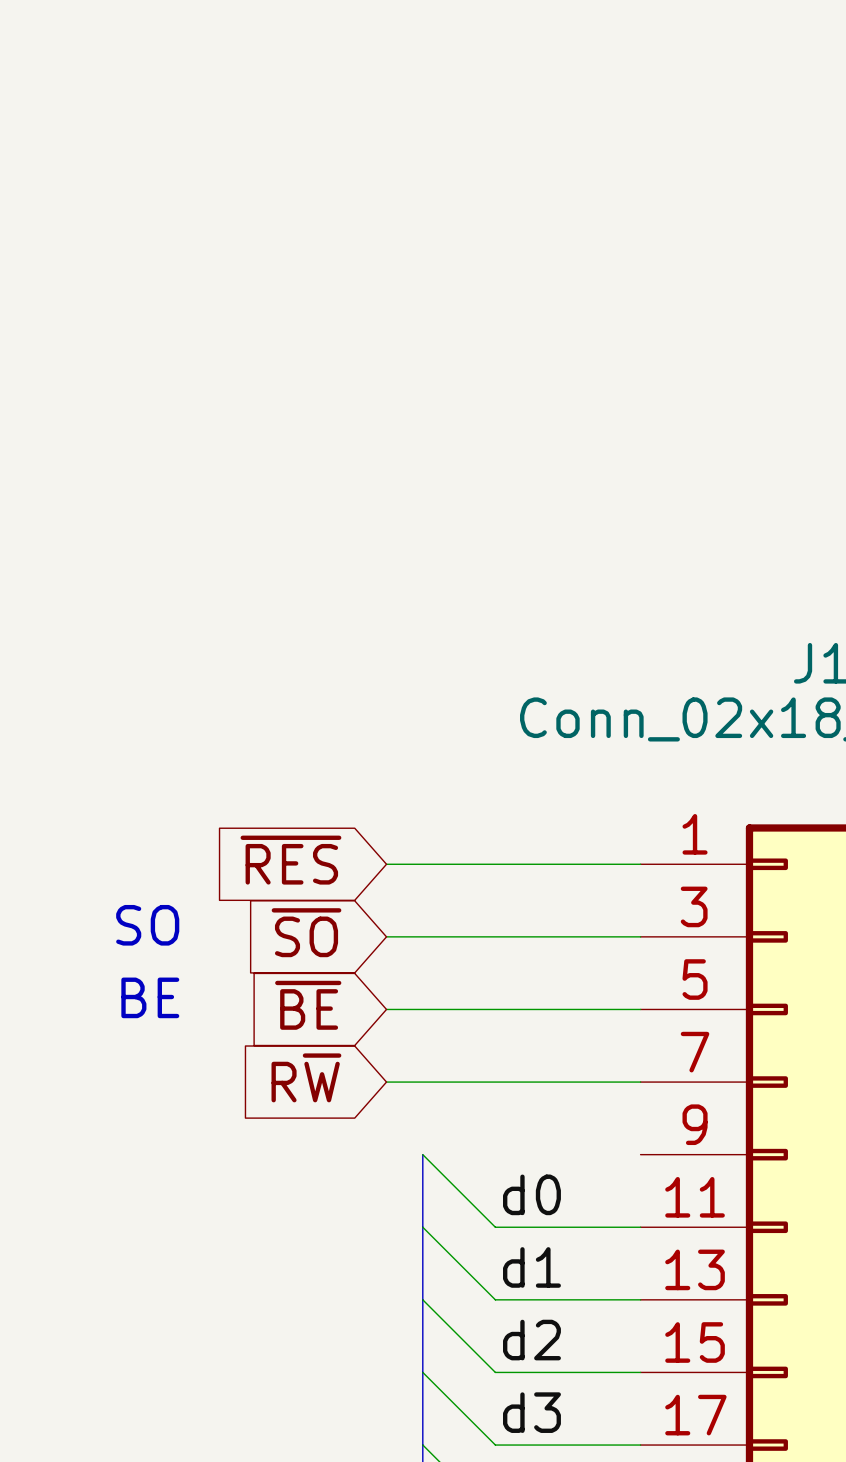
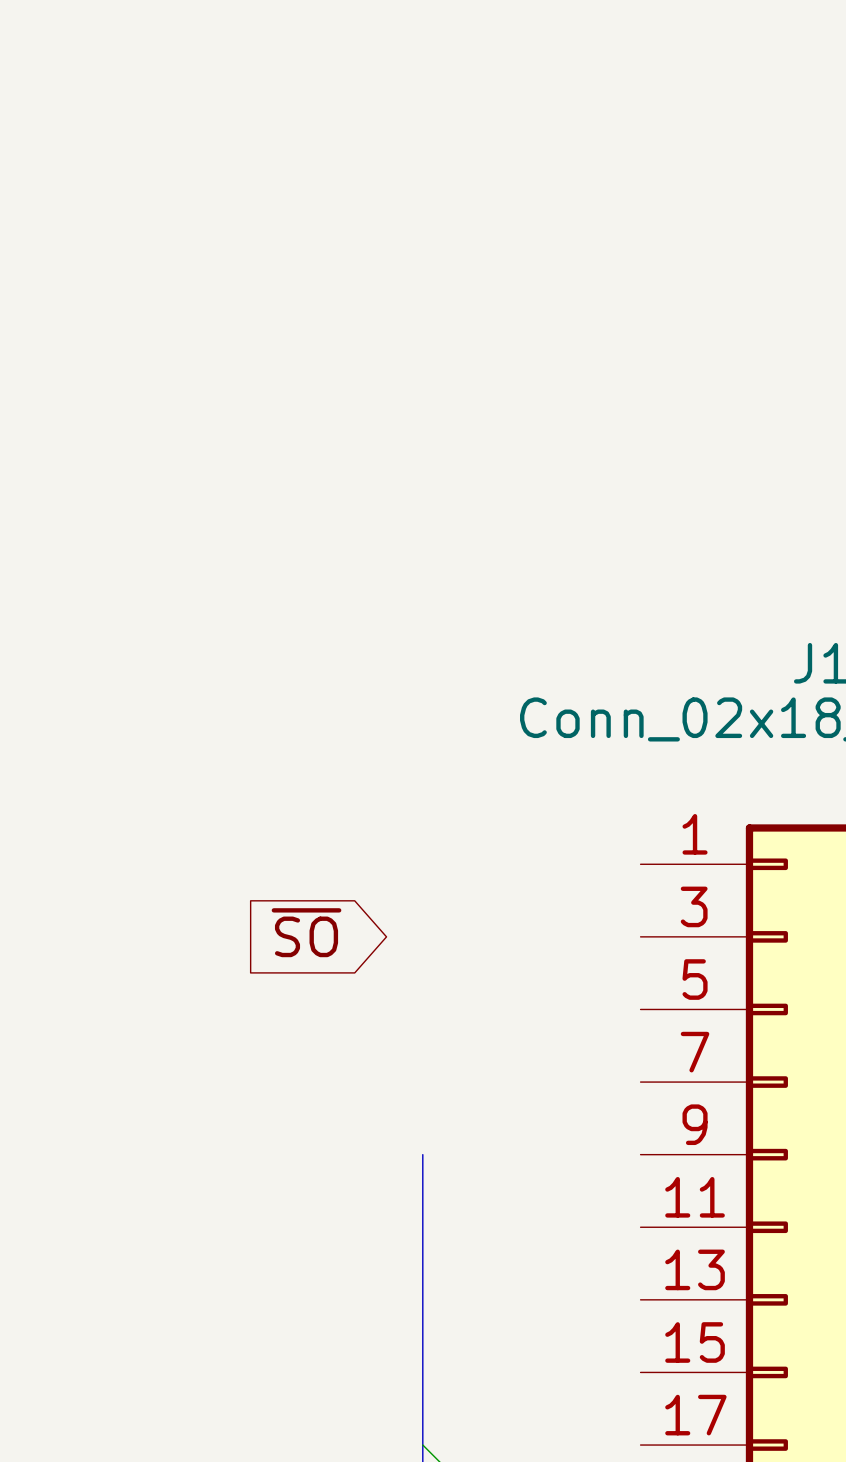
global label: ~{RES} (290, 860) -> none
wire: (386, 864) (640, 864) -> none
text: SO (147, 925) -> none
wire: (386, 936) (640, 936) -> none
text: BE (150, 997) -> none
global label: ~{BE} (308, 1005) -> none
wire: (386, 1009) (640, 1009) -> none
global label: R~{W} (306, 1077) -> none
wire: (386, 1082) (640, 1082) -> none
wire: (422, 1154) (495, 1227) (640, 1227) -> none
label: d0 (531, 1194) -> none
wire: (422, 1227) (495, 1299) (640, 1299) -> none
label: d1 (531, 1267) -> none
wire: (422, 1299) (495, 1372) (640, 1372) -> none
label: d2 (531, 1340) -> none
wire: (422, 1372) (495, 1445) (640, 1445) -> none
label: d3 (531, 1412) -> none

